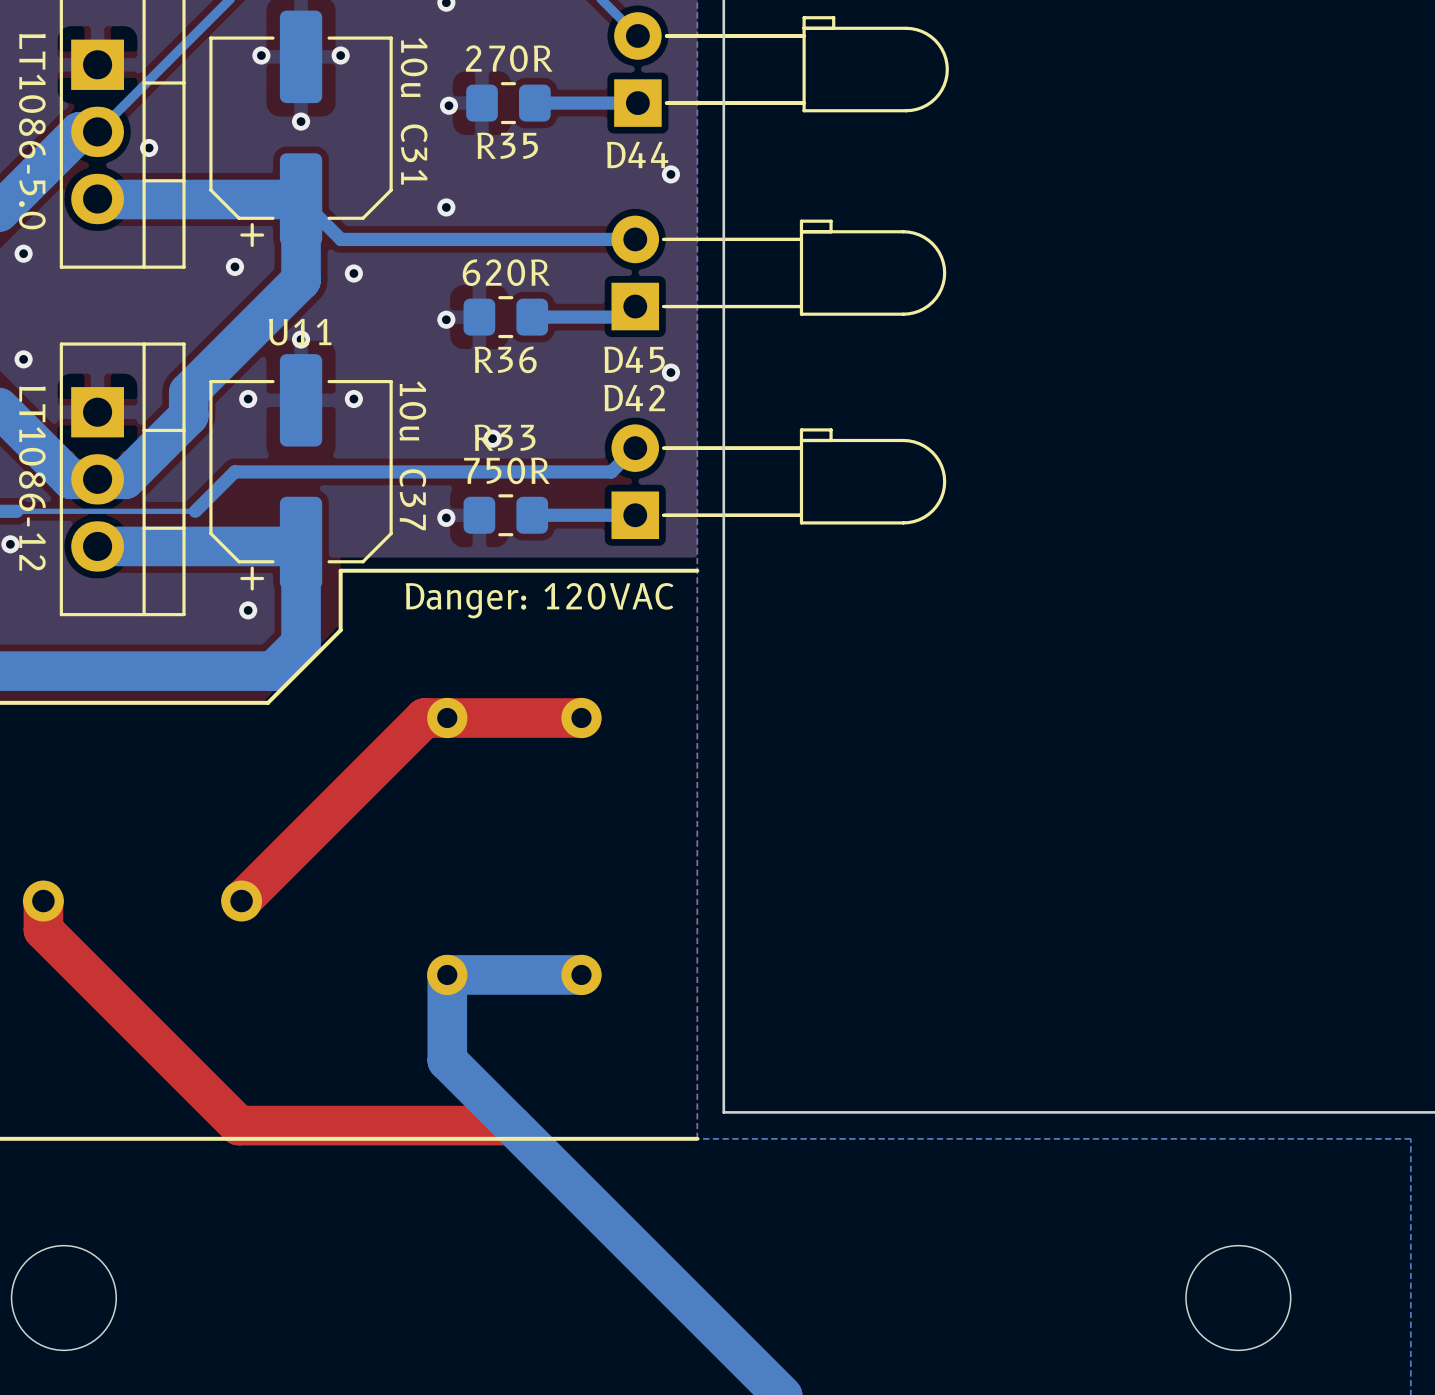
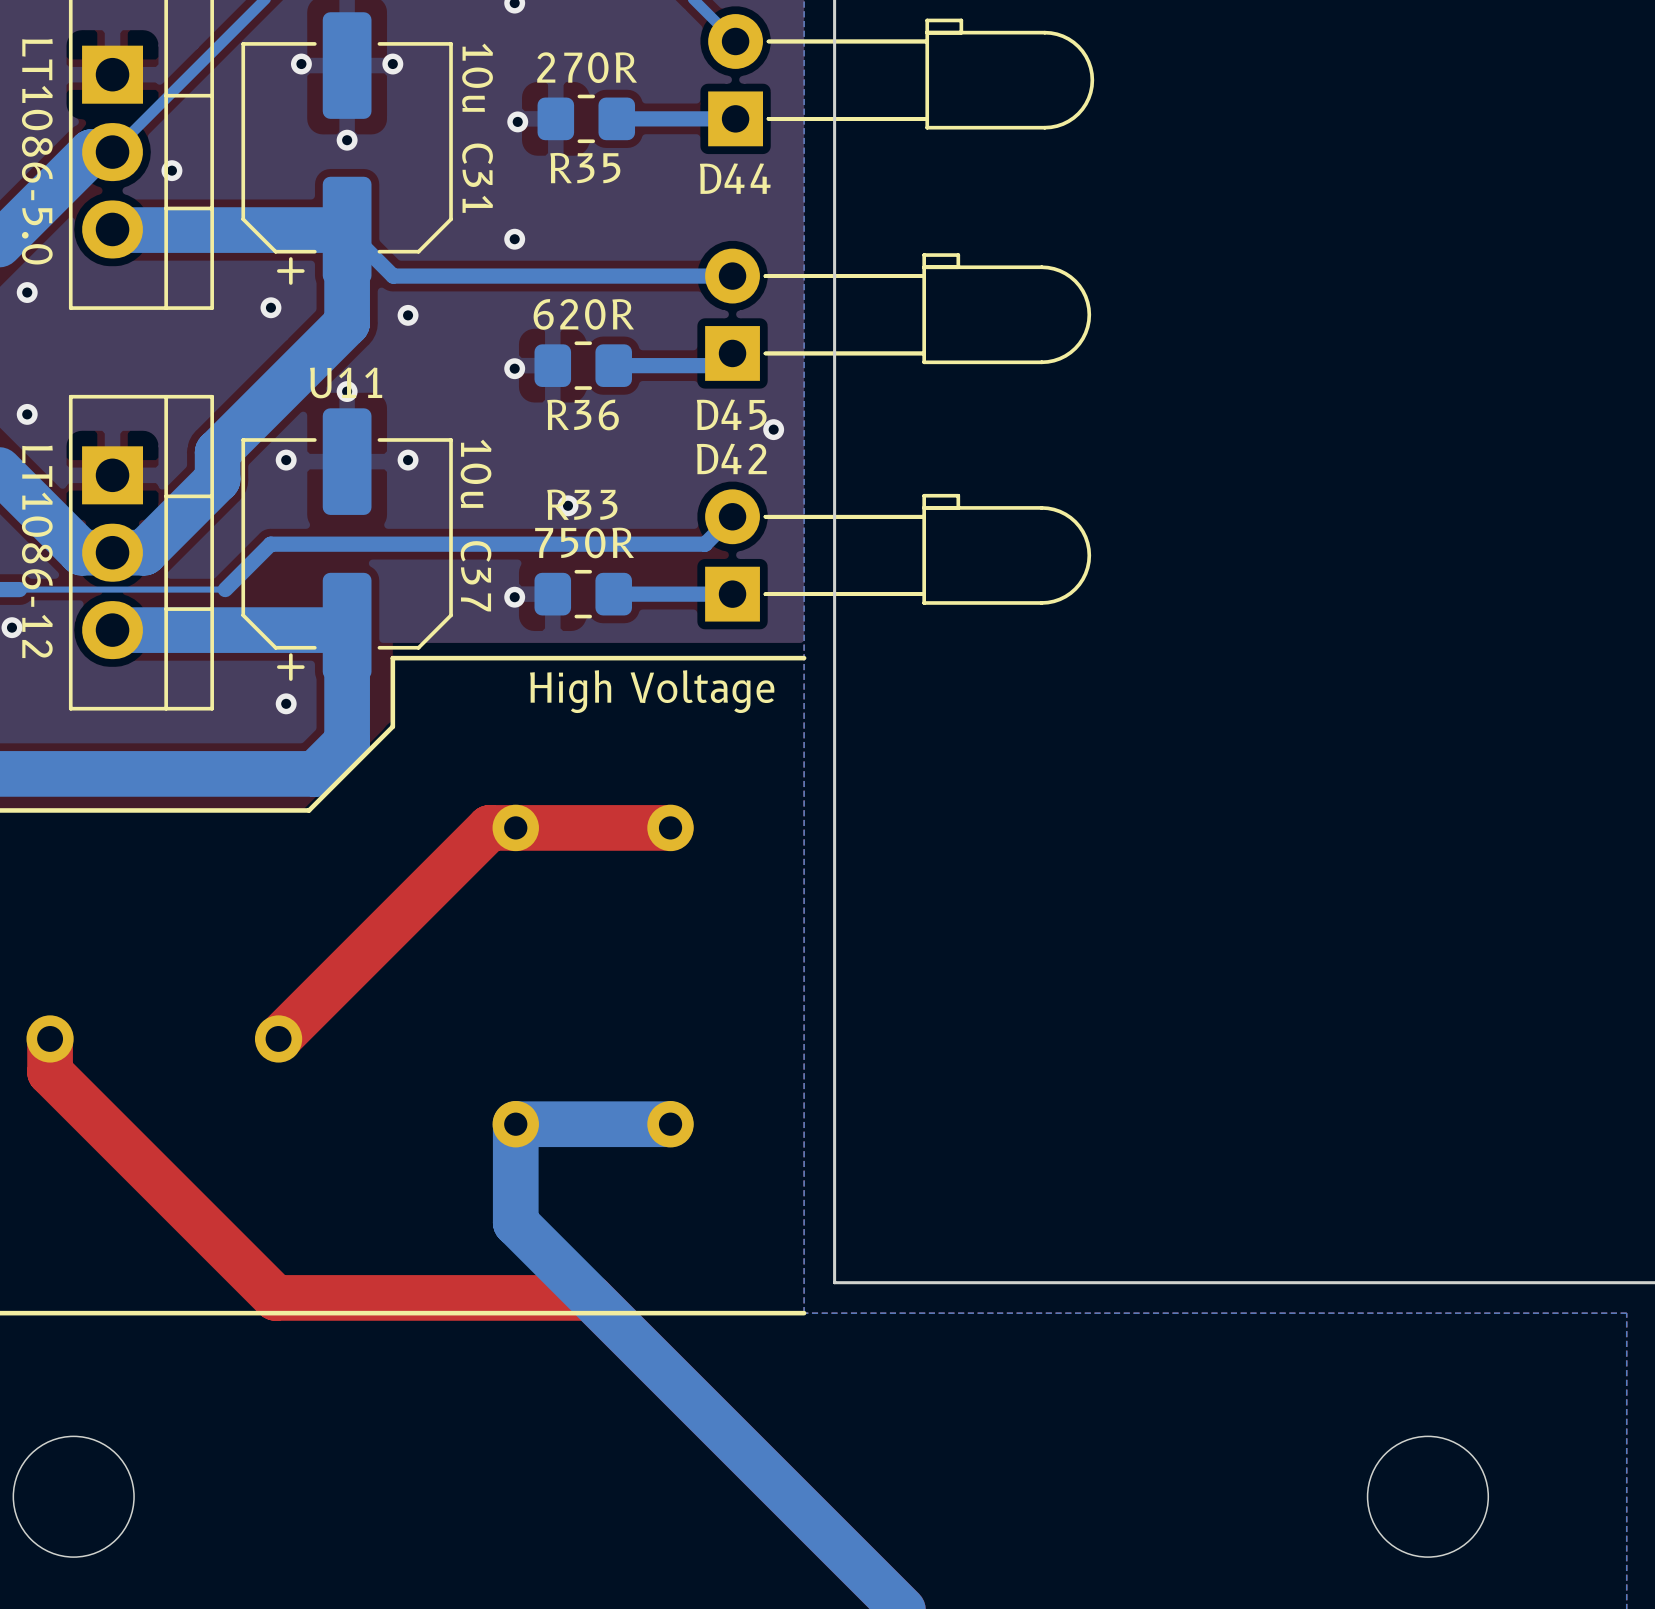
via: (670, 174) -> none
text: Danger: 120VAC (539, 600) -> High Voltage (652, 691)

